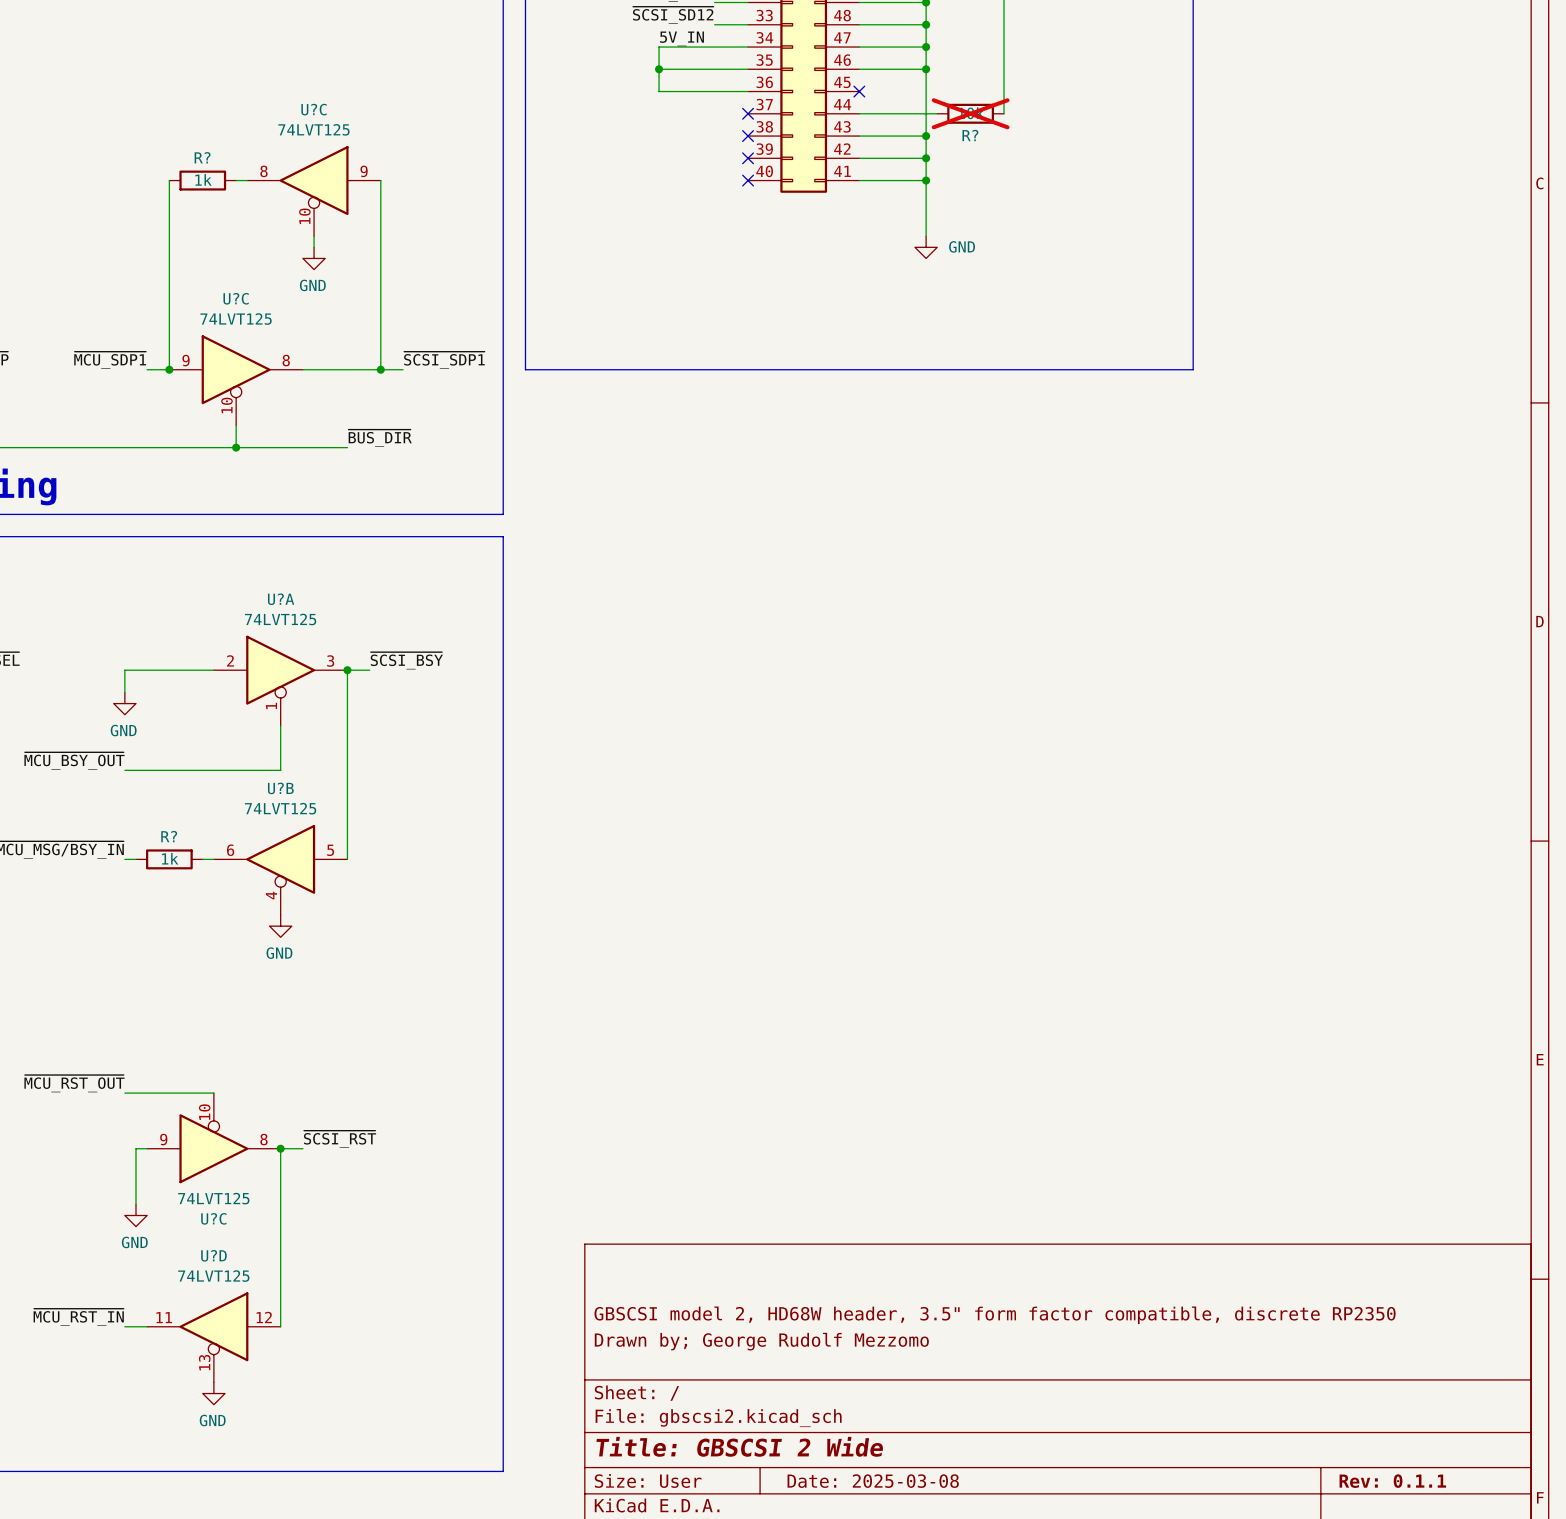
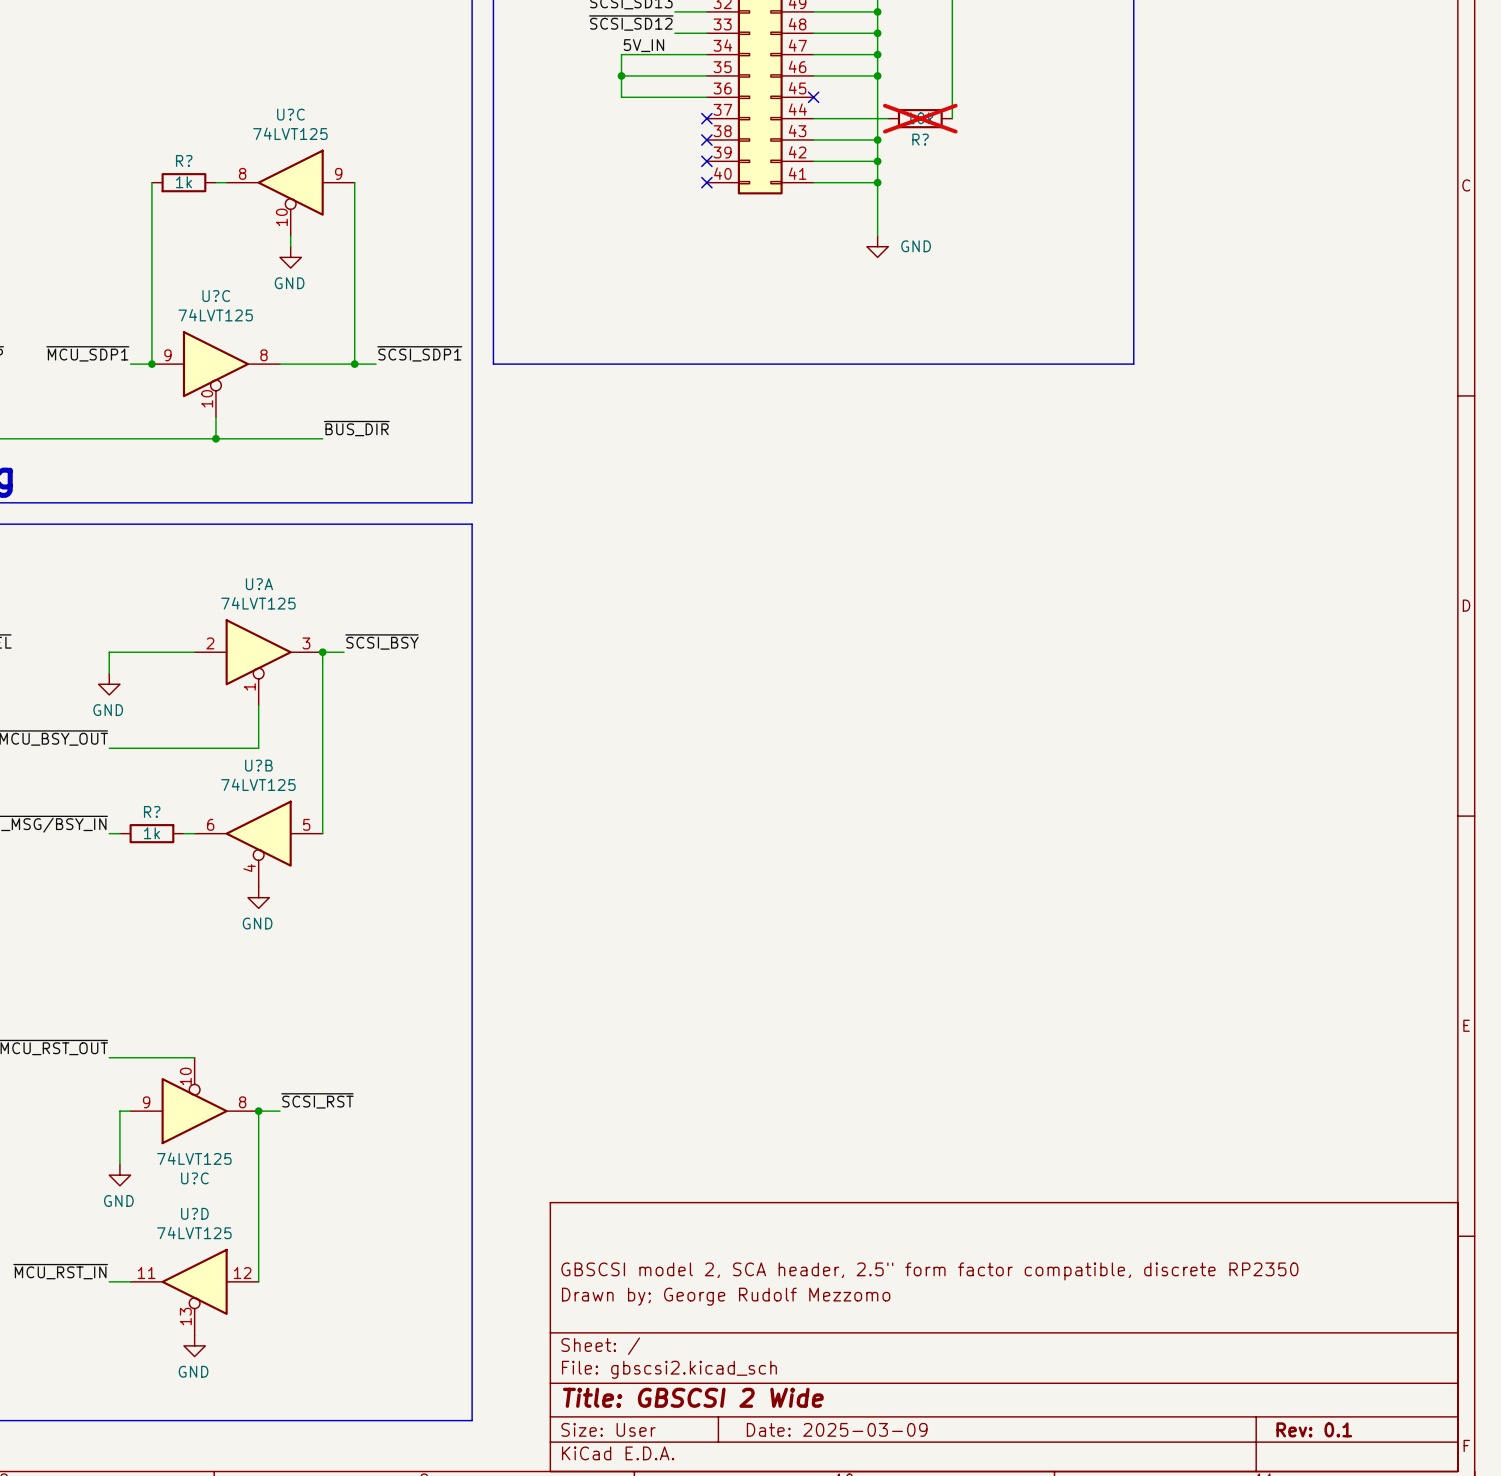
title block: GBSCSI model 2, HD68W header, 3.5" form factor compatible, discrete RP2350 (995, 1315) -> GBSCSI model 2, SCA header, 2.5" form factor compatible, discrete RP2350 (929, 1271)
title block: Date: 2025-03-08 (873, 1481) -> Date: 2025-03-09 (837, 1429)
title block: Rev: 0.1.1 (1392, 1481) -> Rev: 0.1 (1314, 1429)

